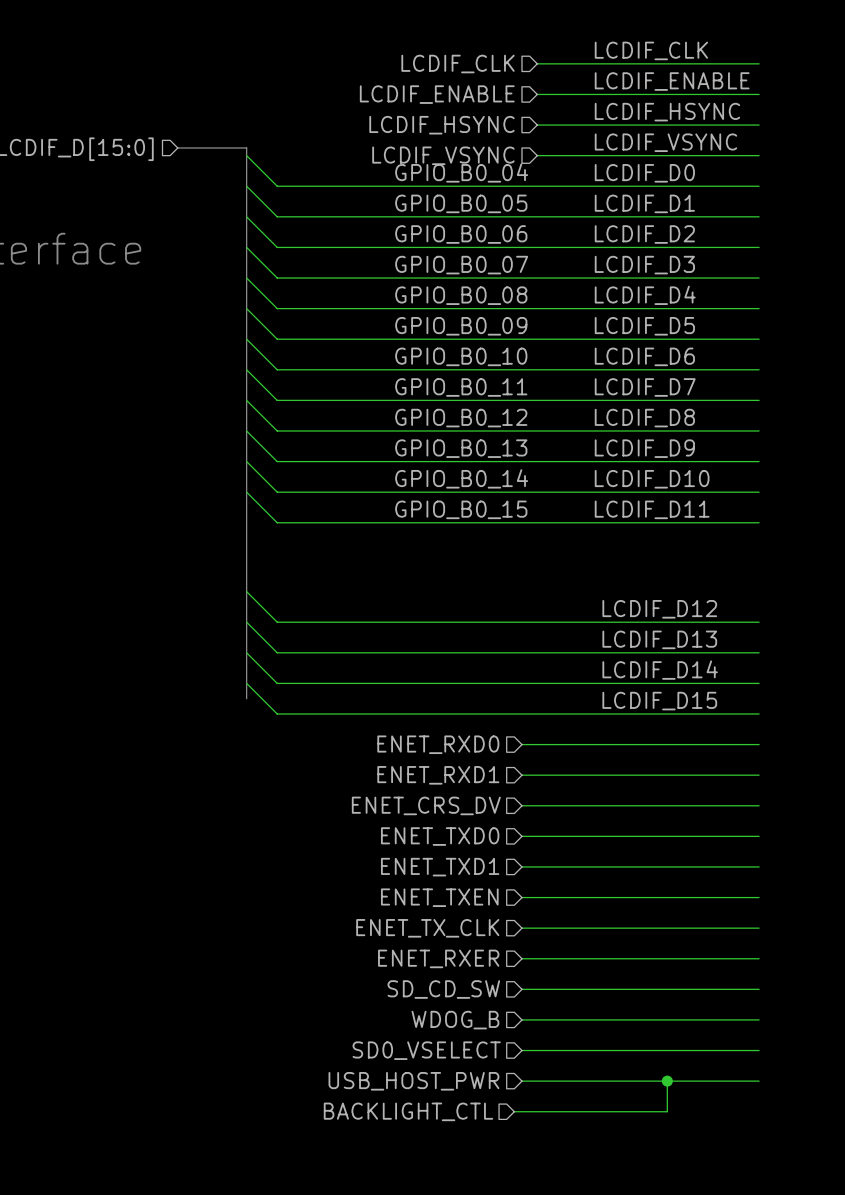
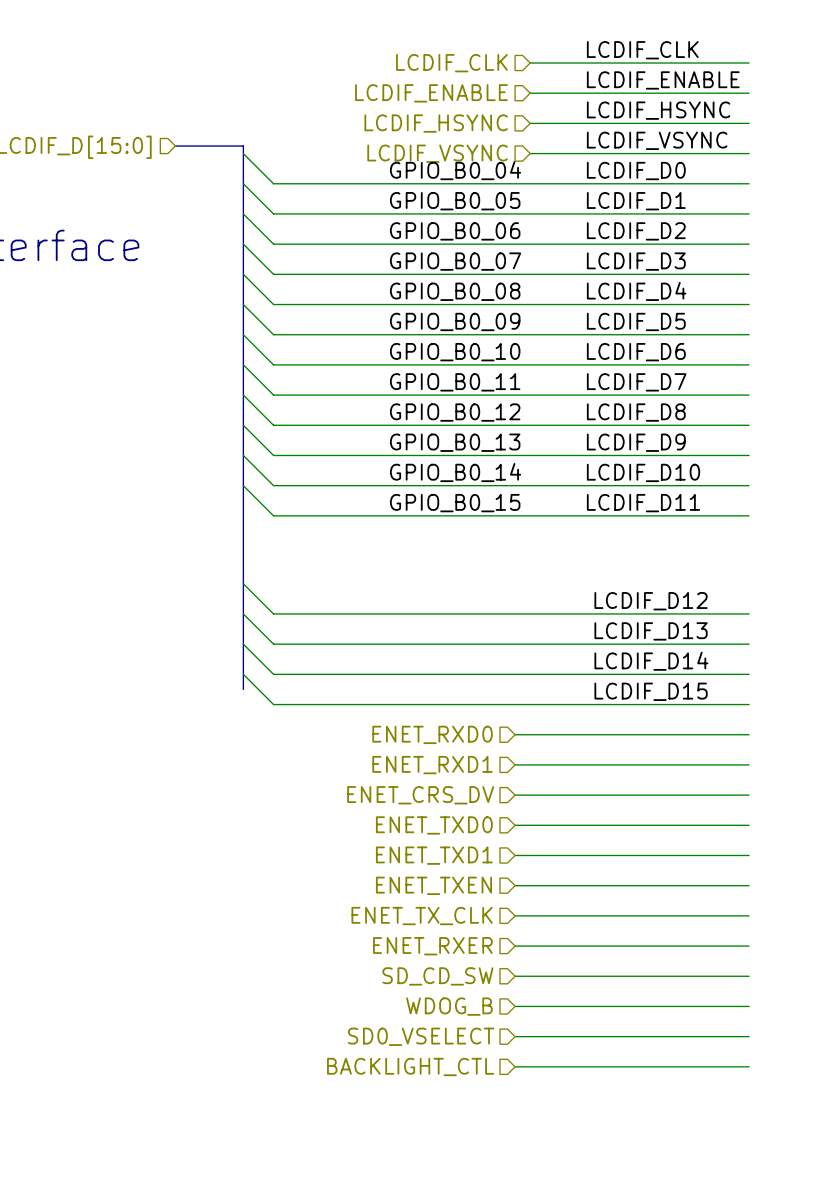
hierarchical label: USB_HOST_PWR (413, 1081) -> BACKLIGHT_CTL (410, 1066)
wire: (667, 1081) (667, 1111) (514, 1111) -> none
junction: (667, 1081) -> none
hierarchical label: BACKLIGHT_CTL (408, 1111) -> none

